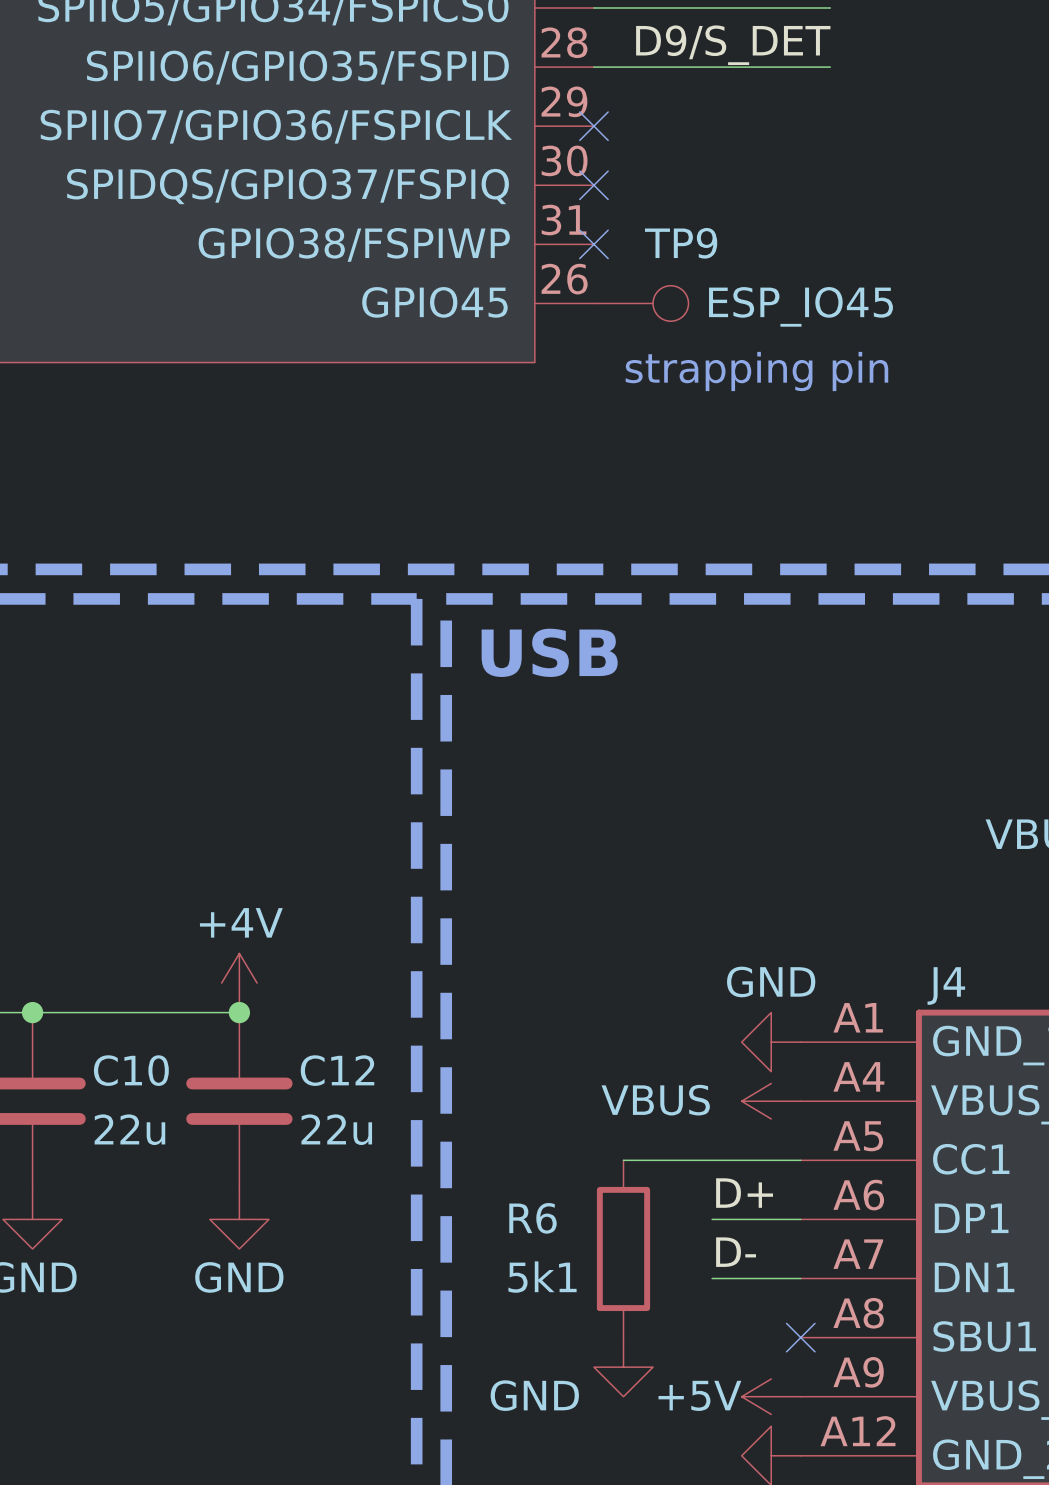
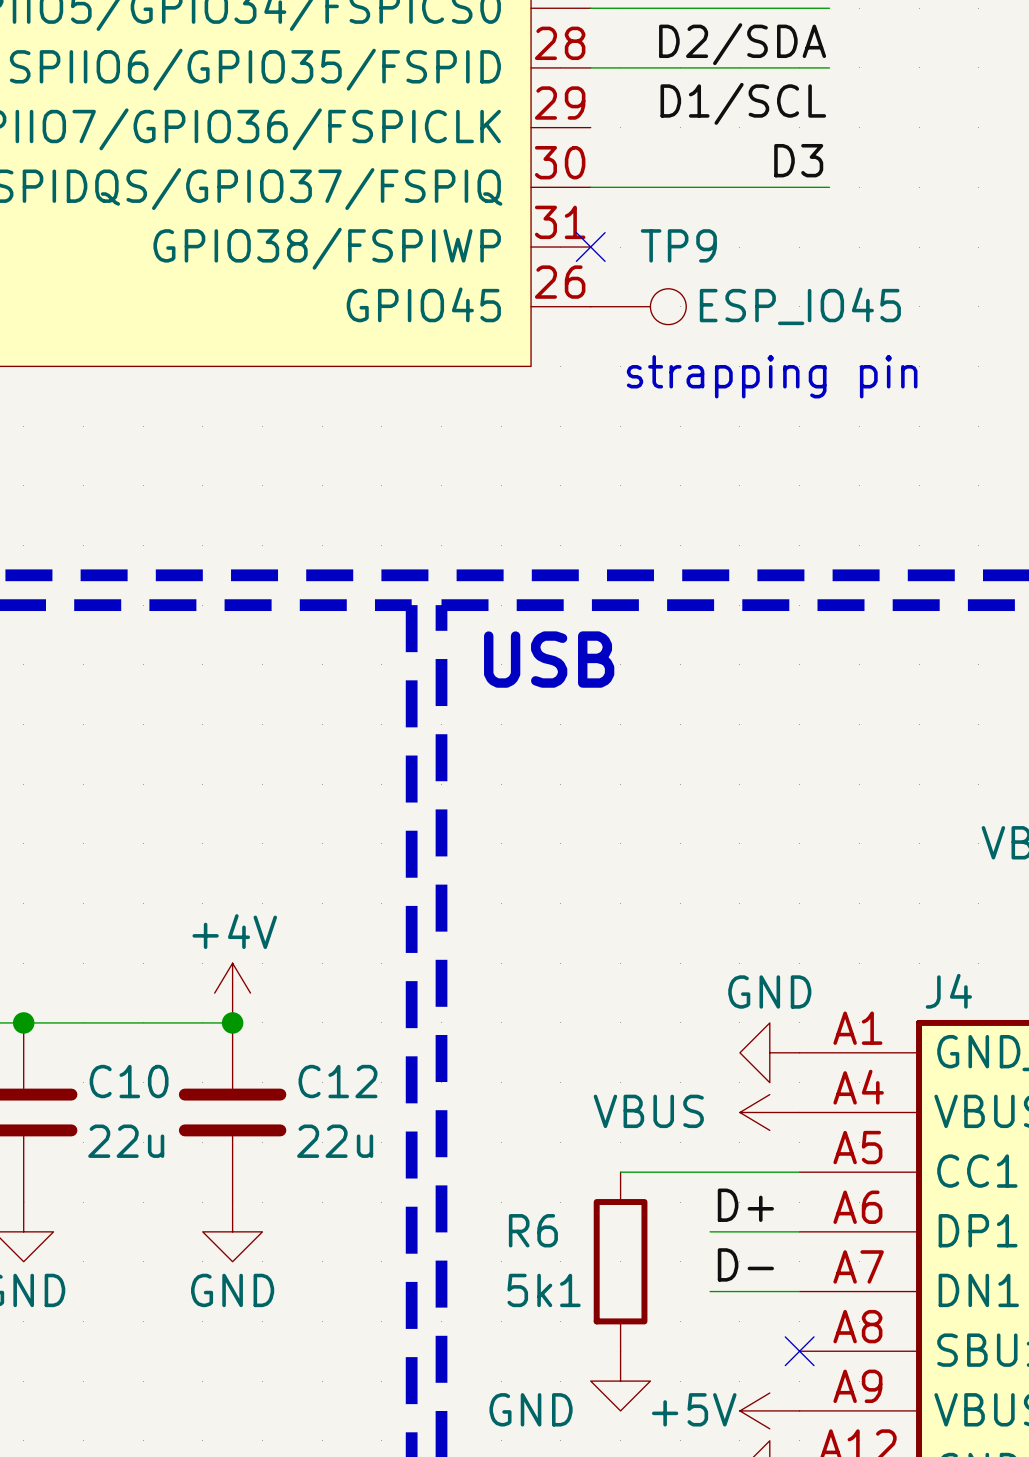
label: D9/S_DET (733, 45) -> D2/SDA (742, 44)
label: none -> D1/SCL (743, 103)
no-connect mark: (593, 126) -> none
label: none -> D3 (798, 160)
wire: none -> (590, 187) (829, 187)
no-connect mark: (593, 185) -> none

